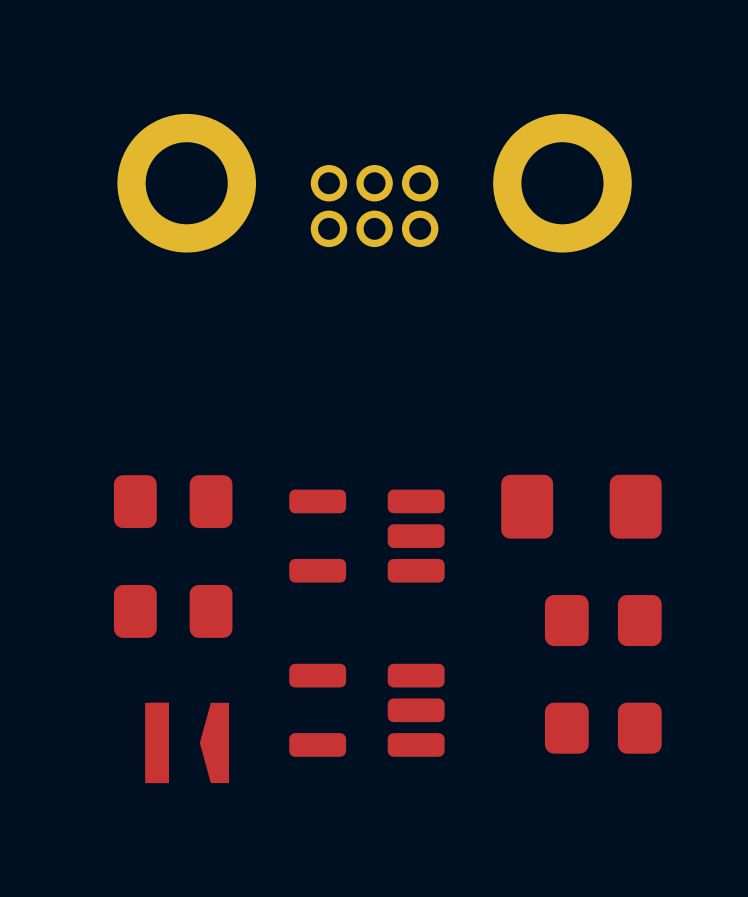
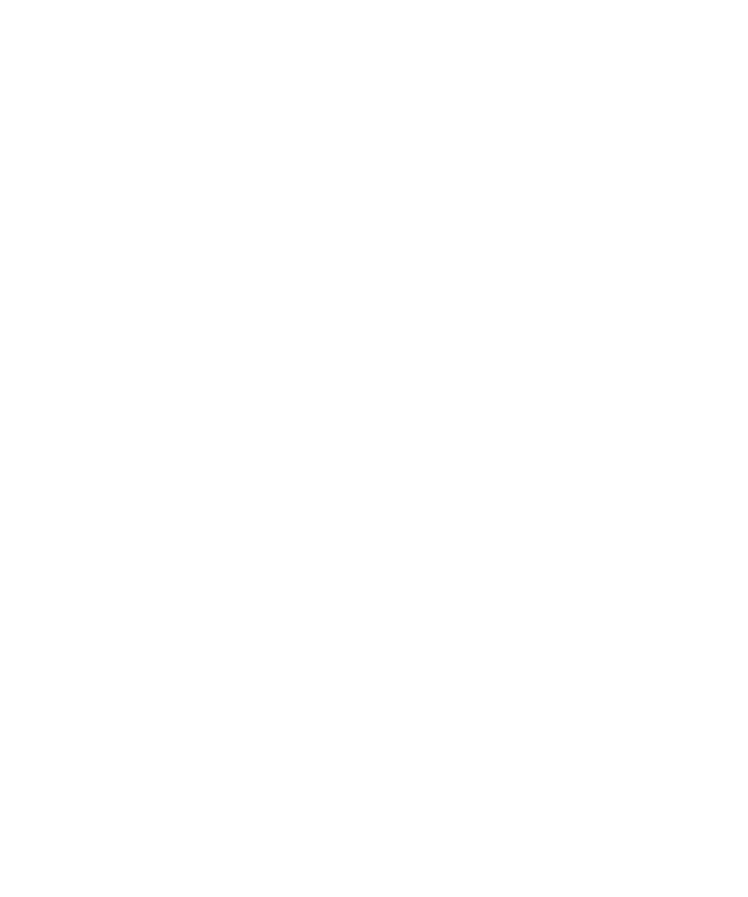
part: (374, 183) -> none
part: (173, 501) -> none
part: (581, 506) -> none
part: (366, 536) -> none
part: (173, 611) -> none
part: (603, 620) -> none
part: (366, 710) -> none
part: (603, 728) -> none
part: (187, 742) -> none

